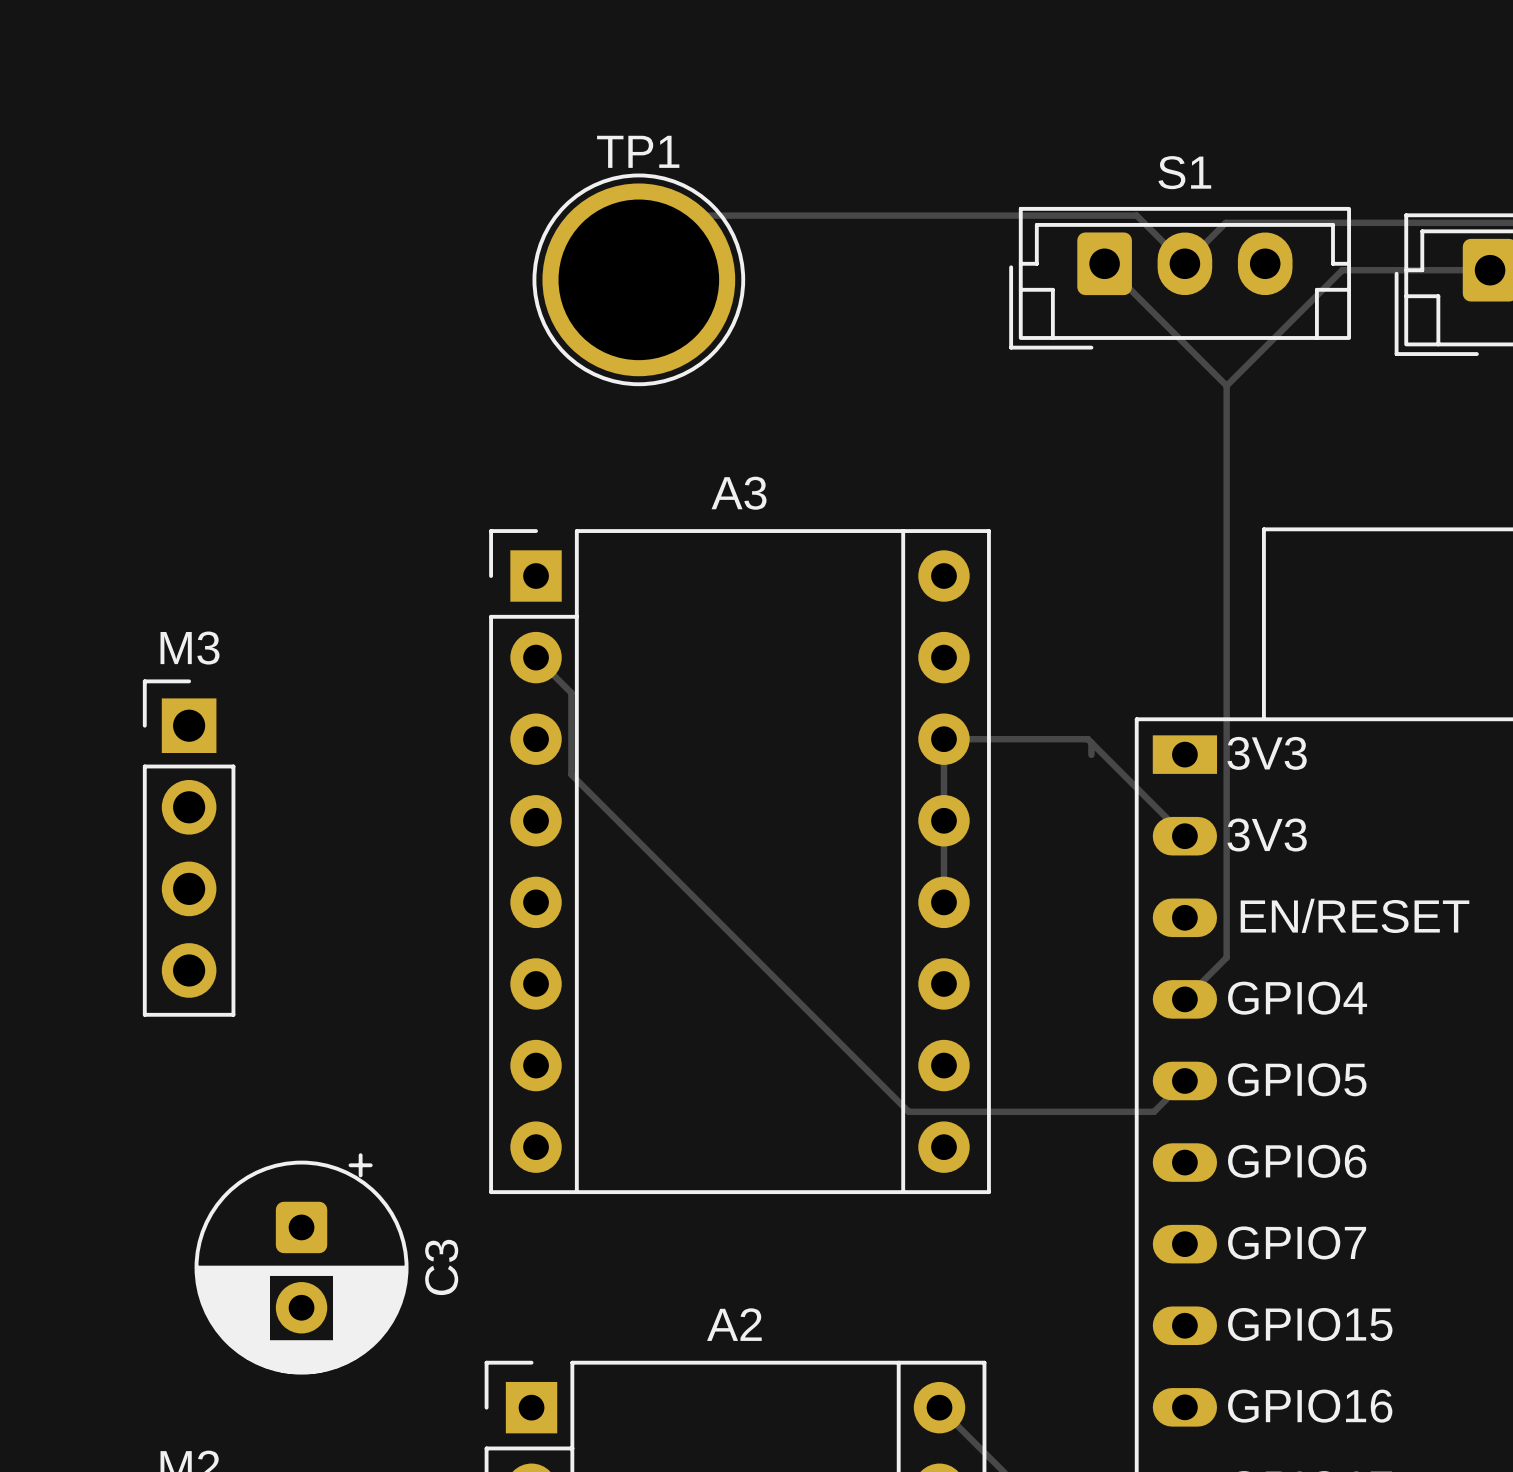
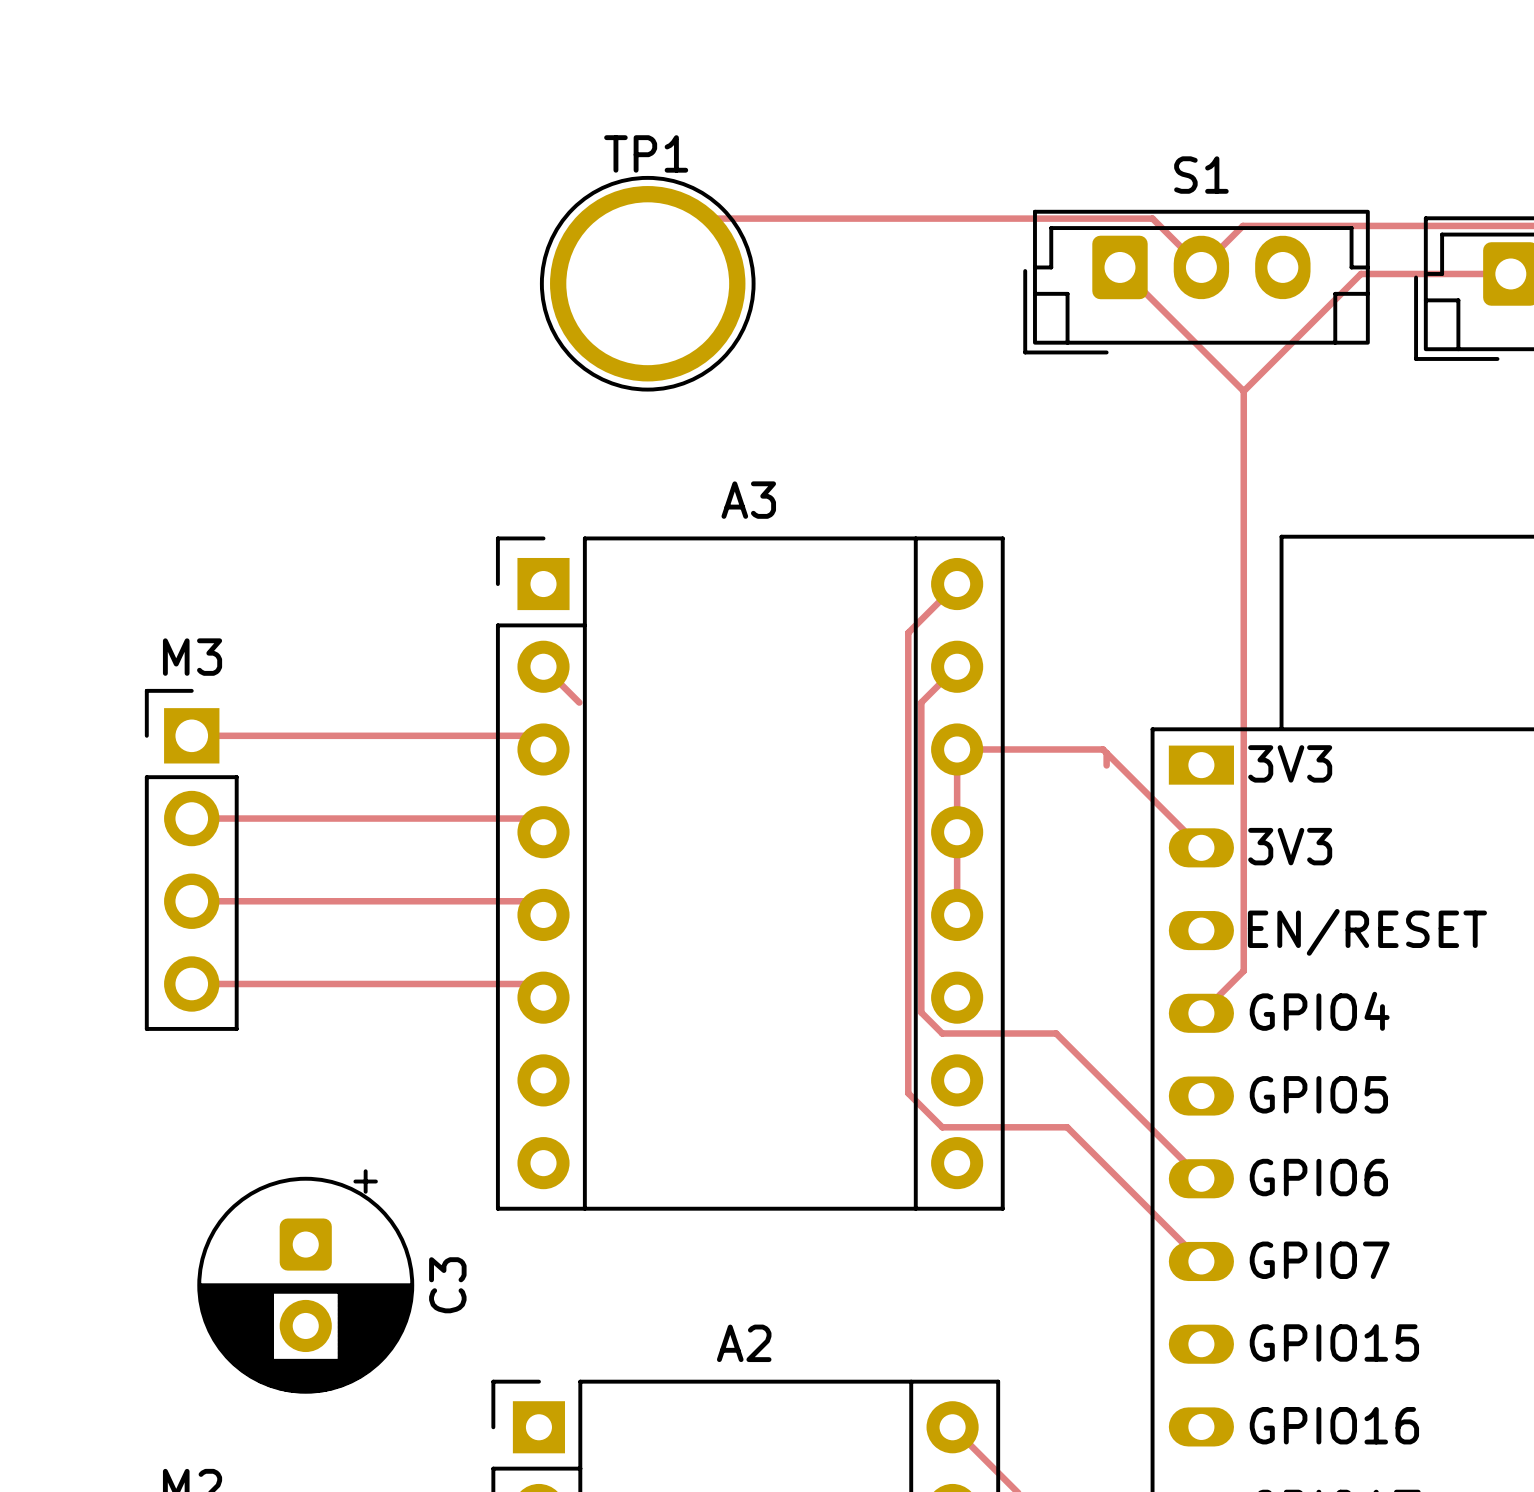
track: none -> (957, 666) (921, 702) (921, 1012) (942, 1033) (1056, 1033) (1201, 1178)
track: (571, 692) (571, 774) (908, 1111) (929, 1111) -> (957, 584) (908, 632) (908, 1093) (942, 1127)
track: none -> (191, 735) (529, 735) (543, 749)
track: none -> (191, 818) (529, 818) (543, 832)
track: none -> (191, 901) (529, 901) (543, 914)
track: none -> (191, 983) (529, 983) (543, 997)
track: (1184, 1080) (1154, 1111) (1052, 1111) -> (1201, 1261) (1067, 1127)

